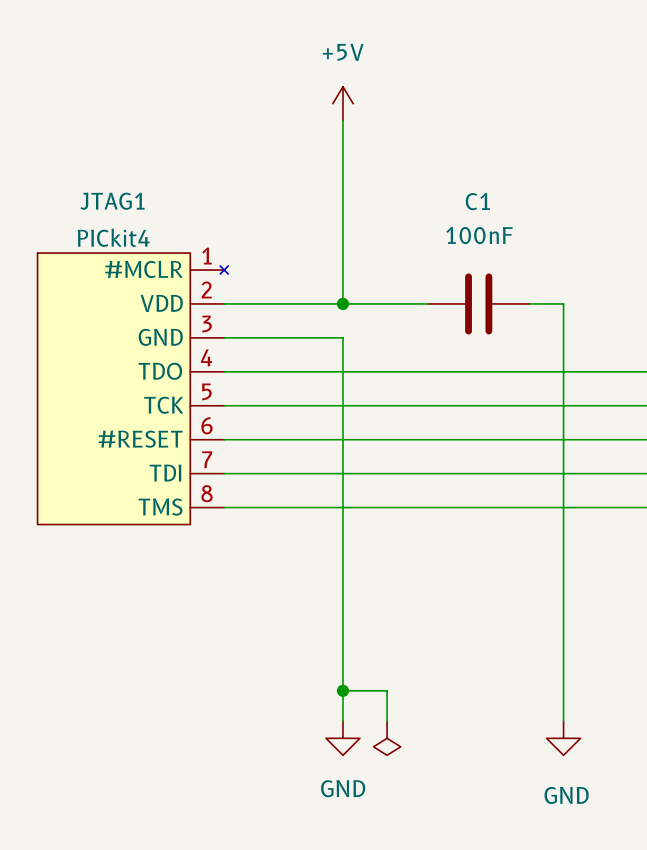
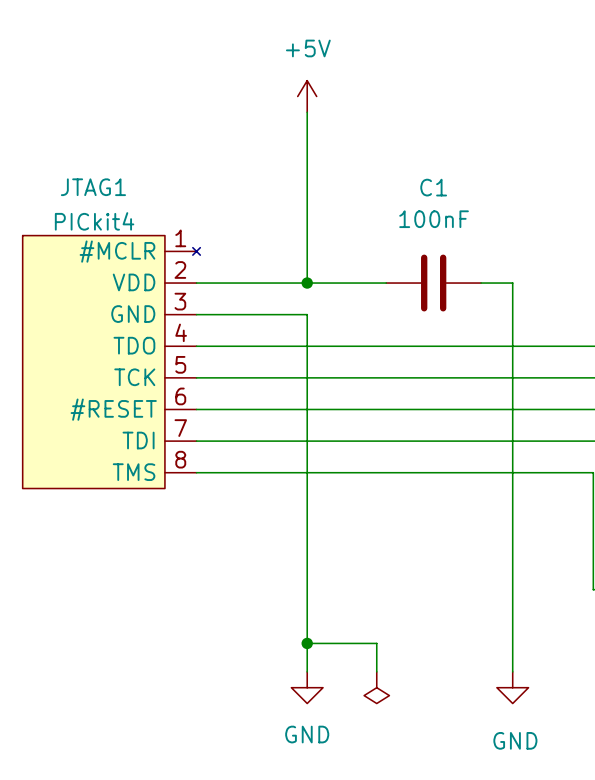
wire: (387, 690) (387, 721) -> (348, 643) (376, 643) (376, 671)
power symbol position: (387, 738) -> (376, 687)

